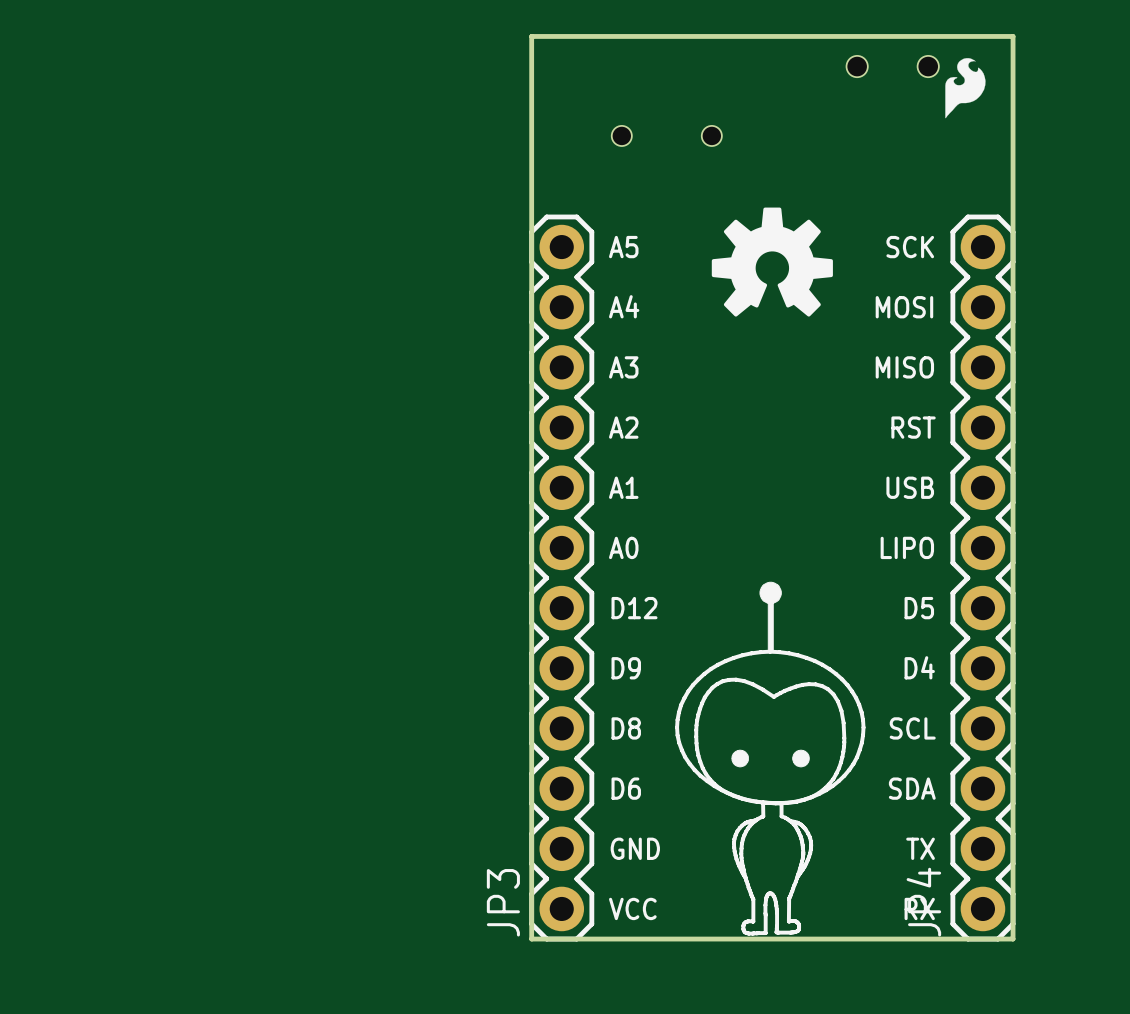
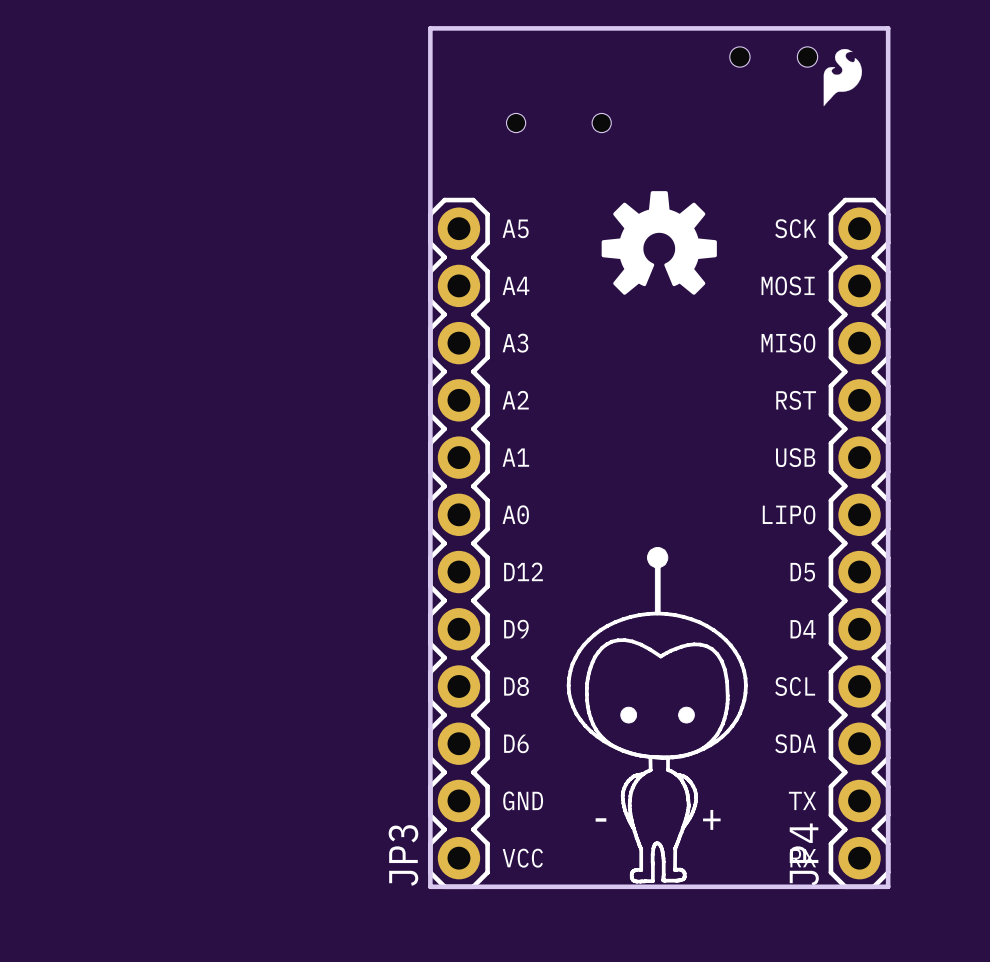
part: none -> (658, 819)

